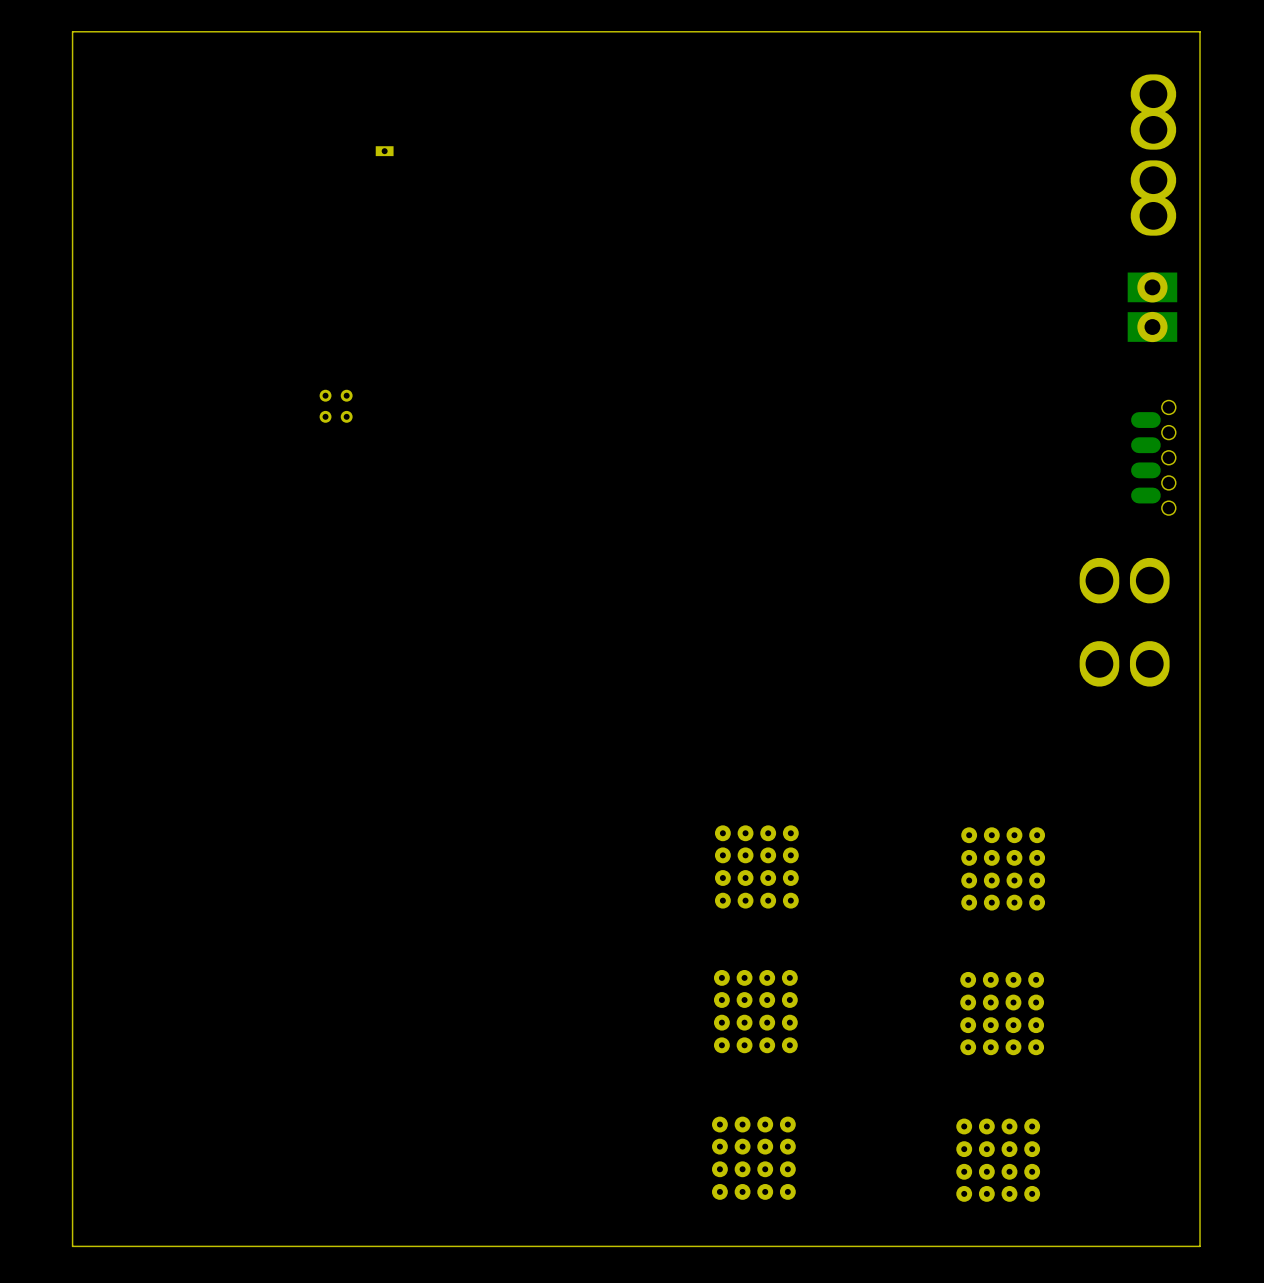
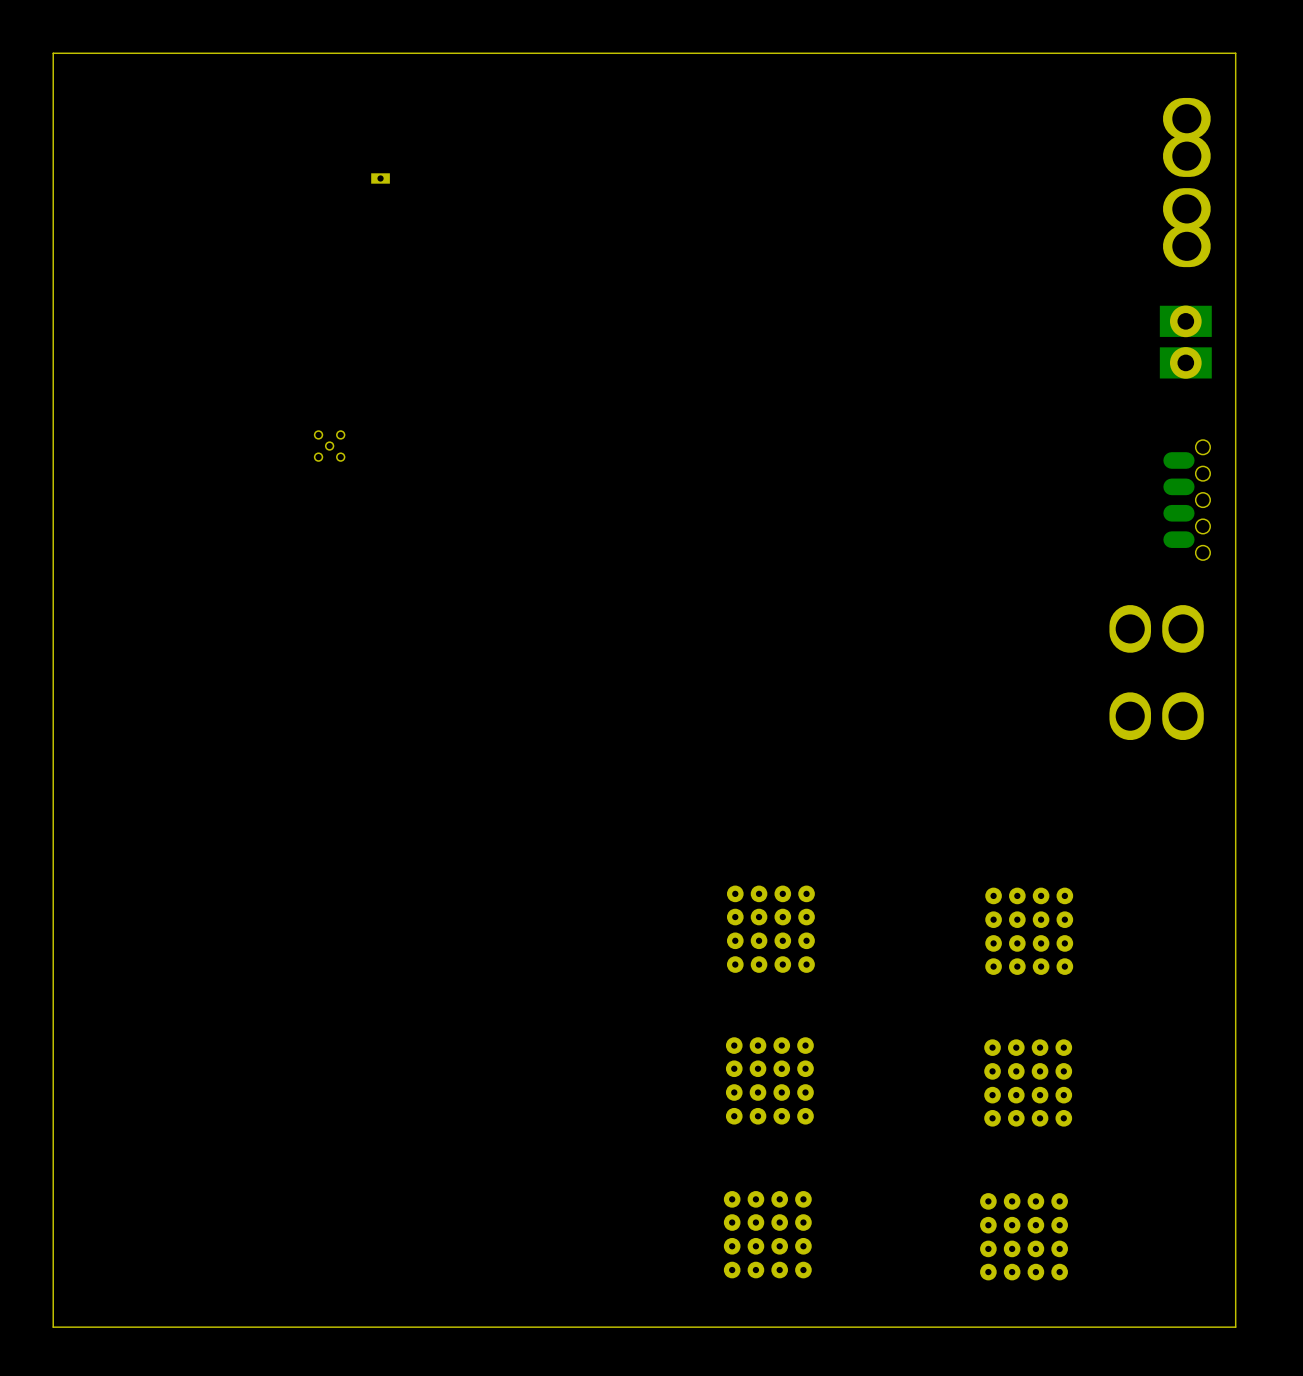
part footprint: [319, 389, 353, 423] -> [313, 430, 346, 462]

